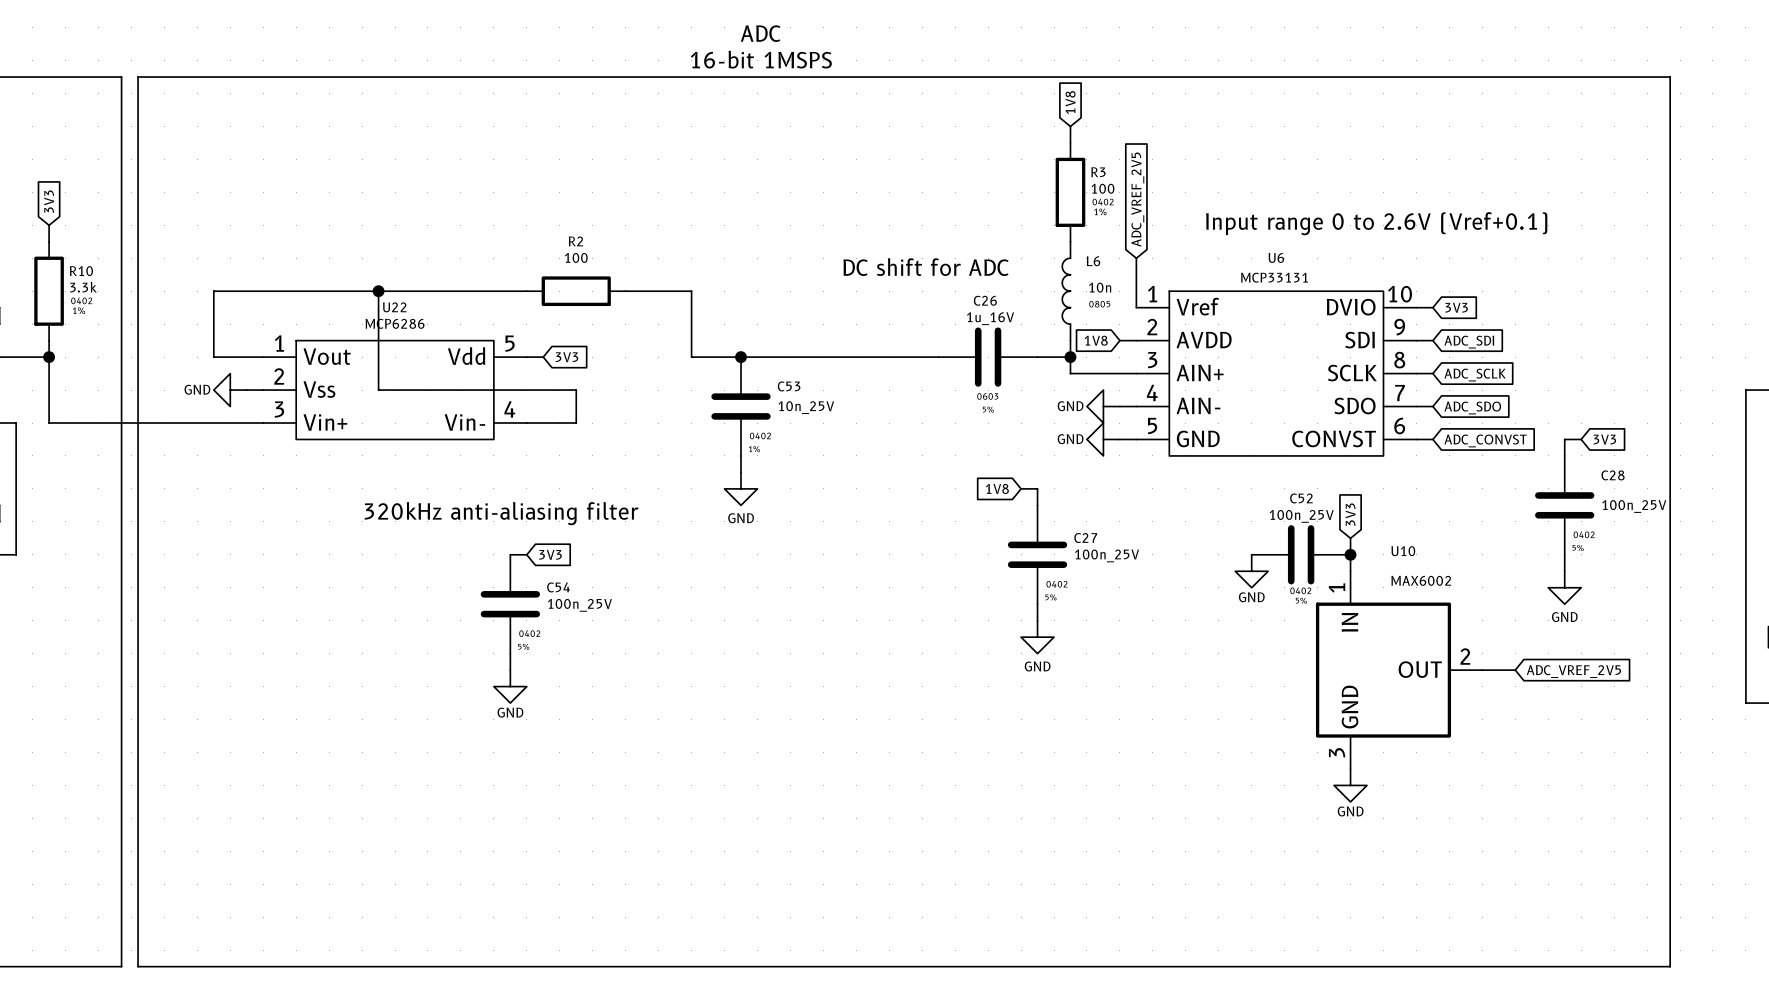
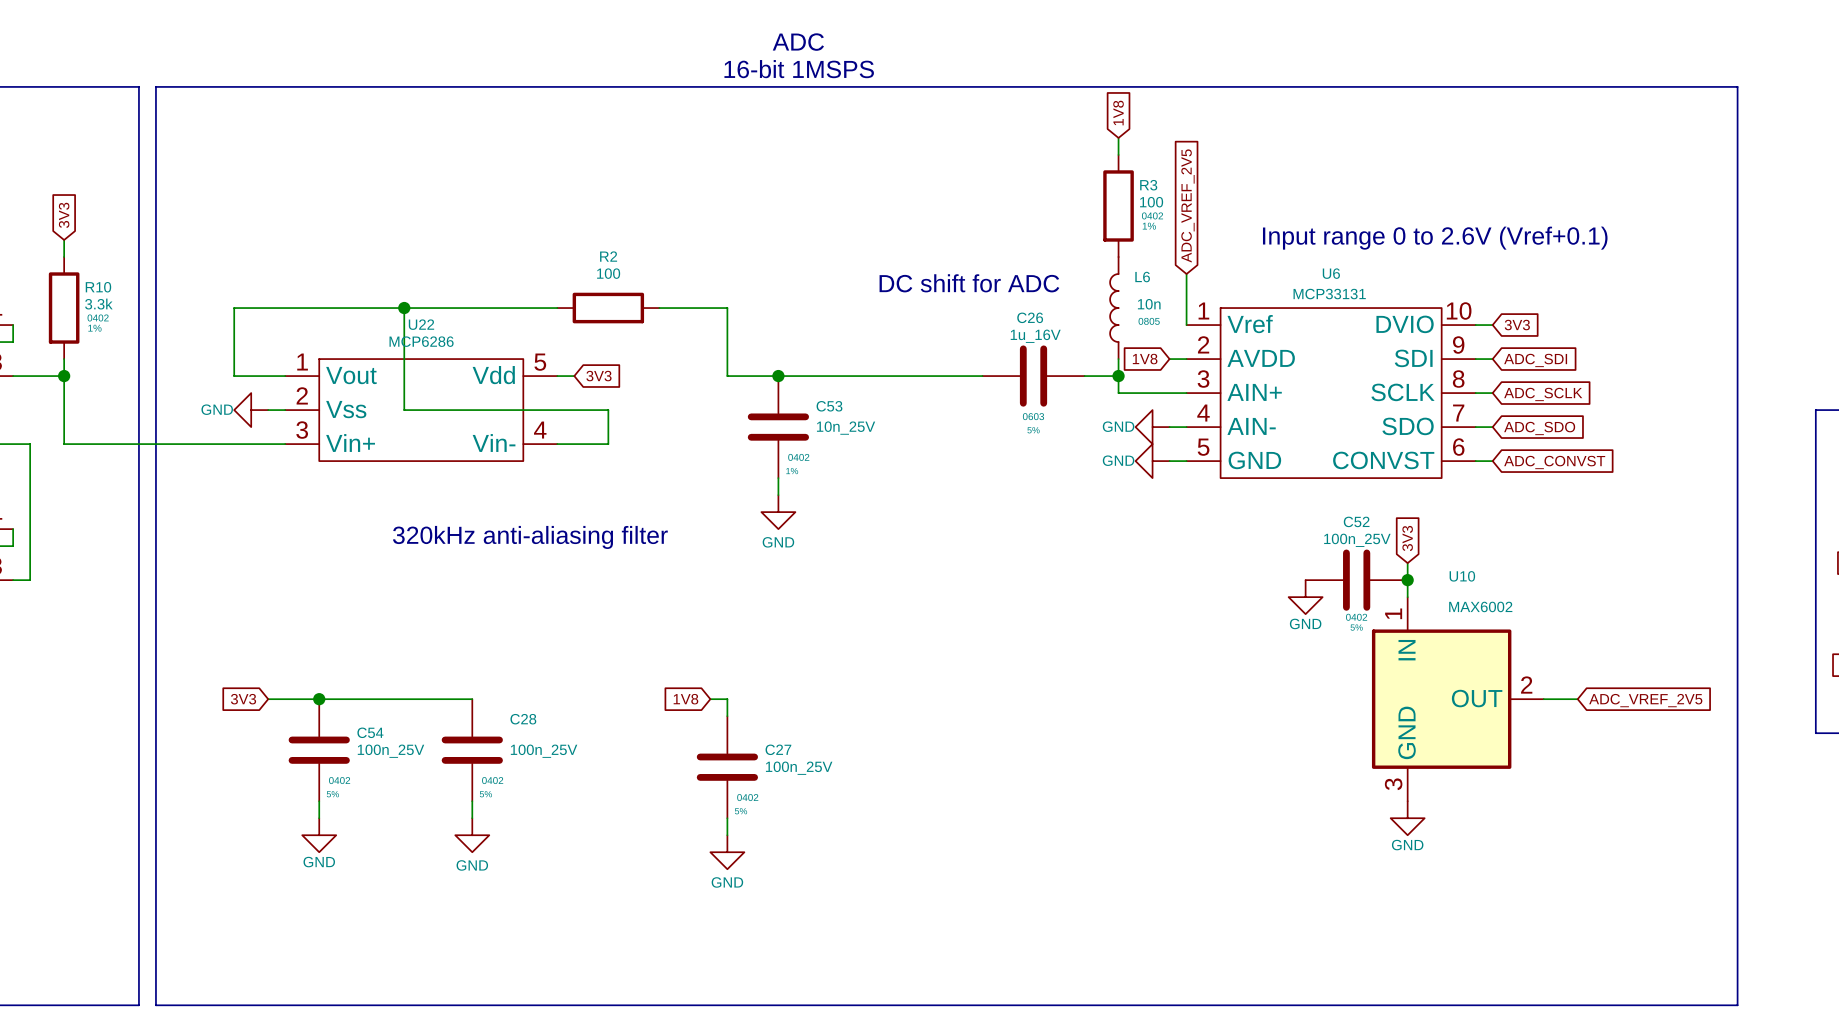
wire: (1581, 439) (1564, 439) (1564, 455) -> none
global label: 3V3 (1604, 439) -> none
global label: 1V8 (997, 488) -> none
wire: (1021, 488) (1037, 488) (1037, 505) -> none
C28 position: (1564, 505) -> (472, 750)
wire: (510, 554) (526, 554) -> none
global label rotation: 0° (550, 554) -> 180° (243, 699)
global label position: 3V3 (550, 554) -> 3V3 (243, 699)
C27 position: (1037, 554) -> (727, 767)
wire: (1564, 554) (1564, 571) -> none
power symbol: GND (1564, 587) -> none
C54 position: (510, 604) -> (319, 750)
wire: (1037, 604) (1037, 620) -> none
power symbol: GND (1037, 637) -> none
wire: (510, 653) (510, 670) -> (472, 801) (472, 818)
wire: none -> (268, 699) (472, 699)
junction: none -> (319, 699)
global label: none -> 1V8 (685, 699)
wire: none -> (710, 699) (727, 699) (727, 716)
power symbol: GND (510, 686) -> none
wire: none -> (319, 801) (319, 818)
wire: none -> (727, 818) (727, 835)
power symbol: none -> GND (319, 835)
power symbol: none -> GND (472, 835)
power symbol: none -> GND (727, 852)

